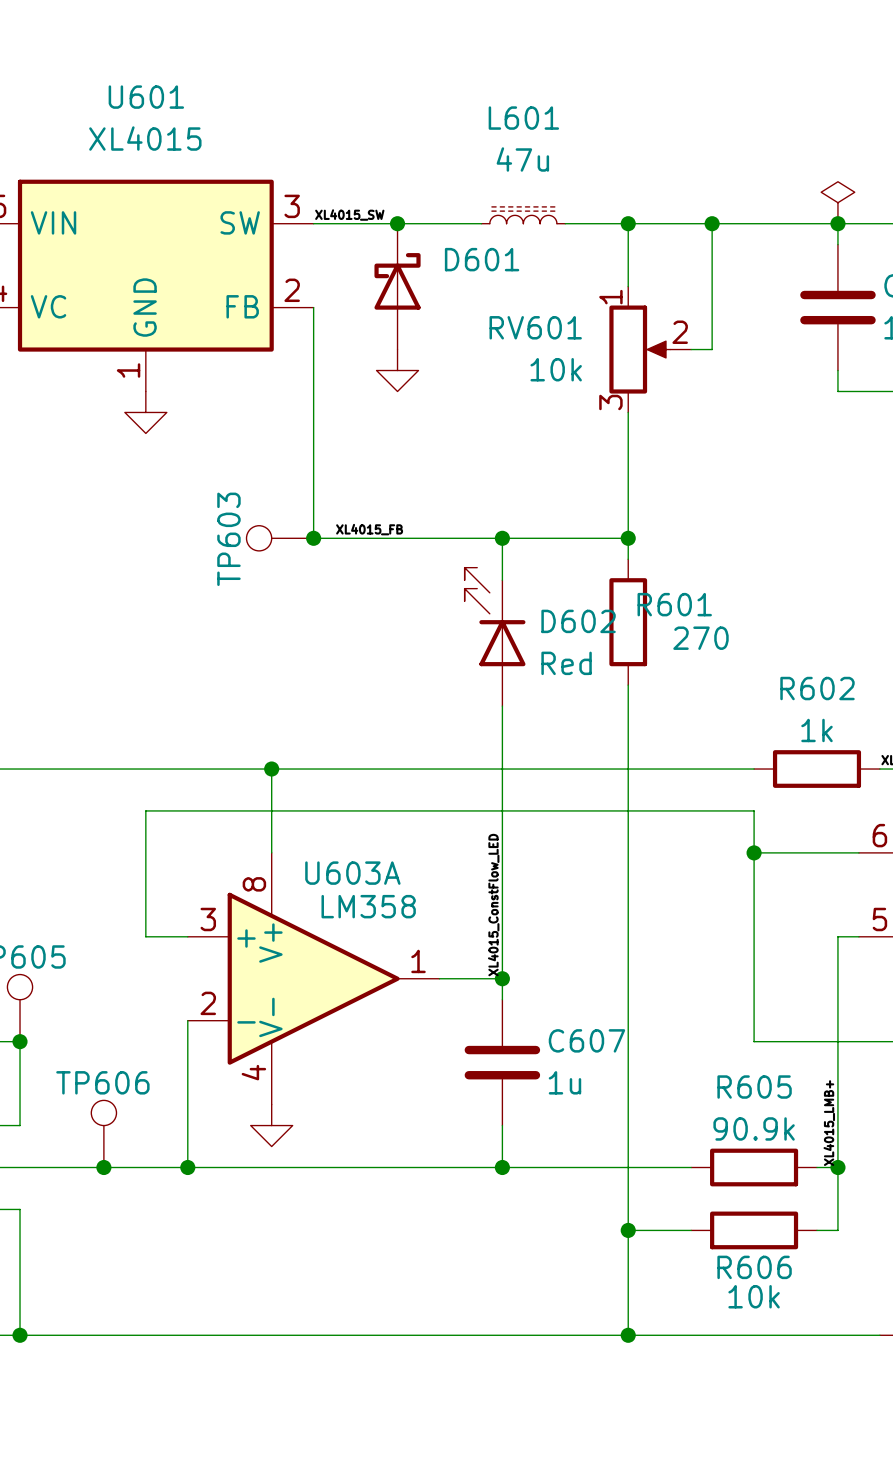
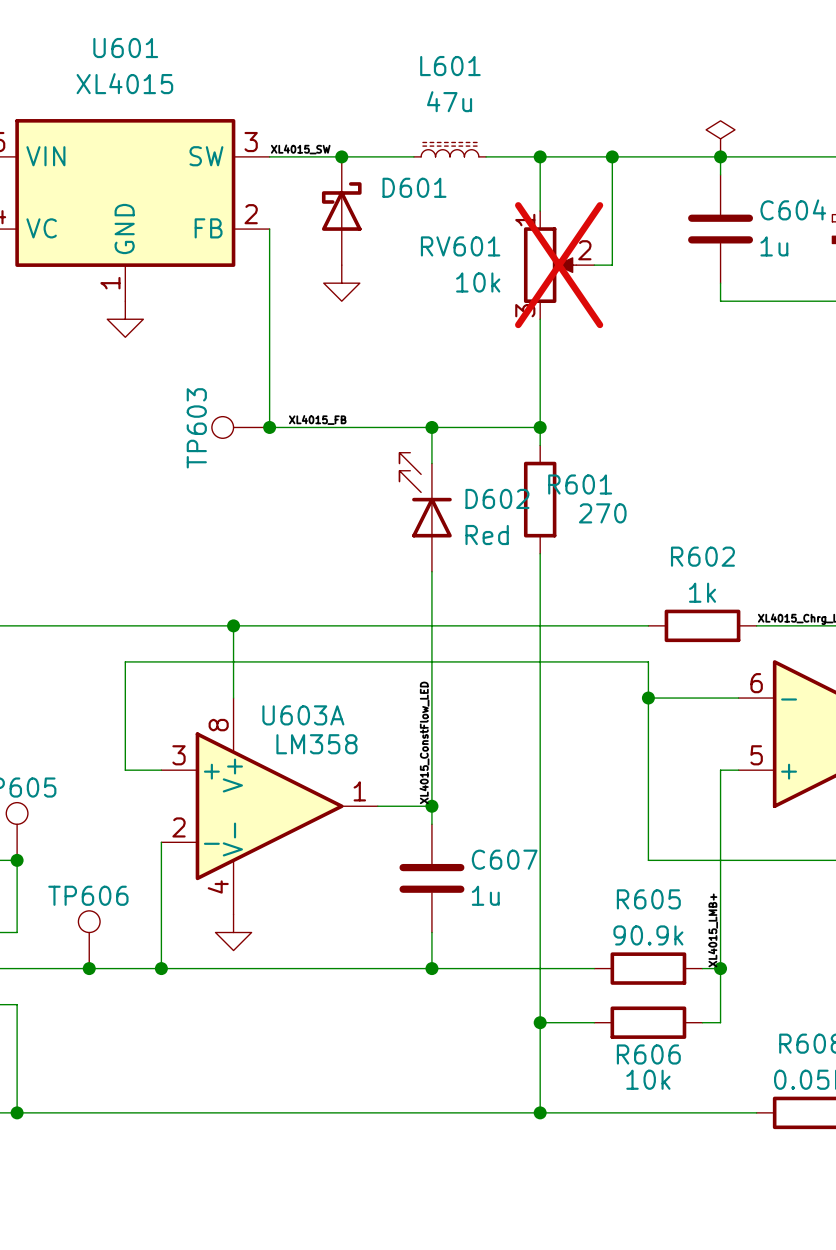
RV601 do-not-place cross: none -> (559, 265)

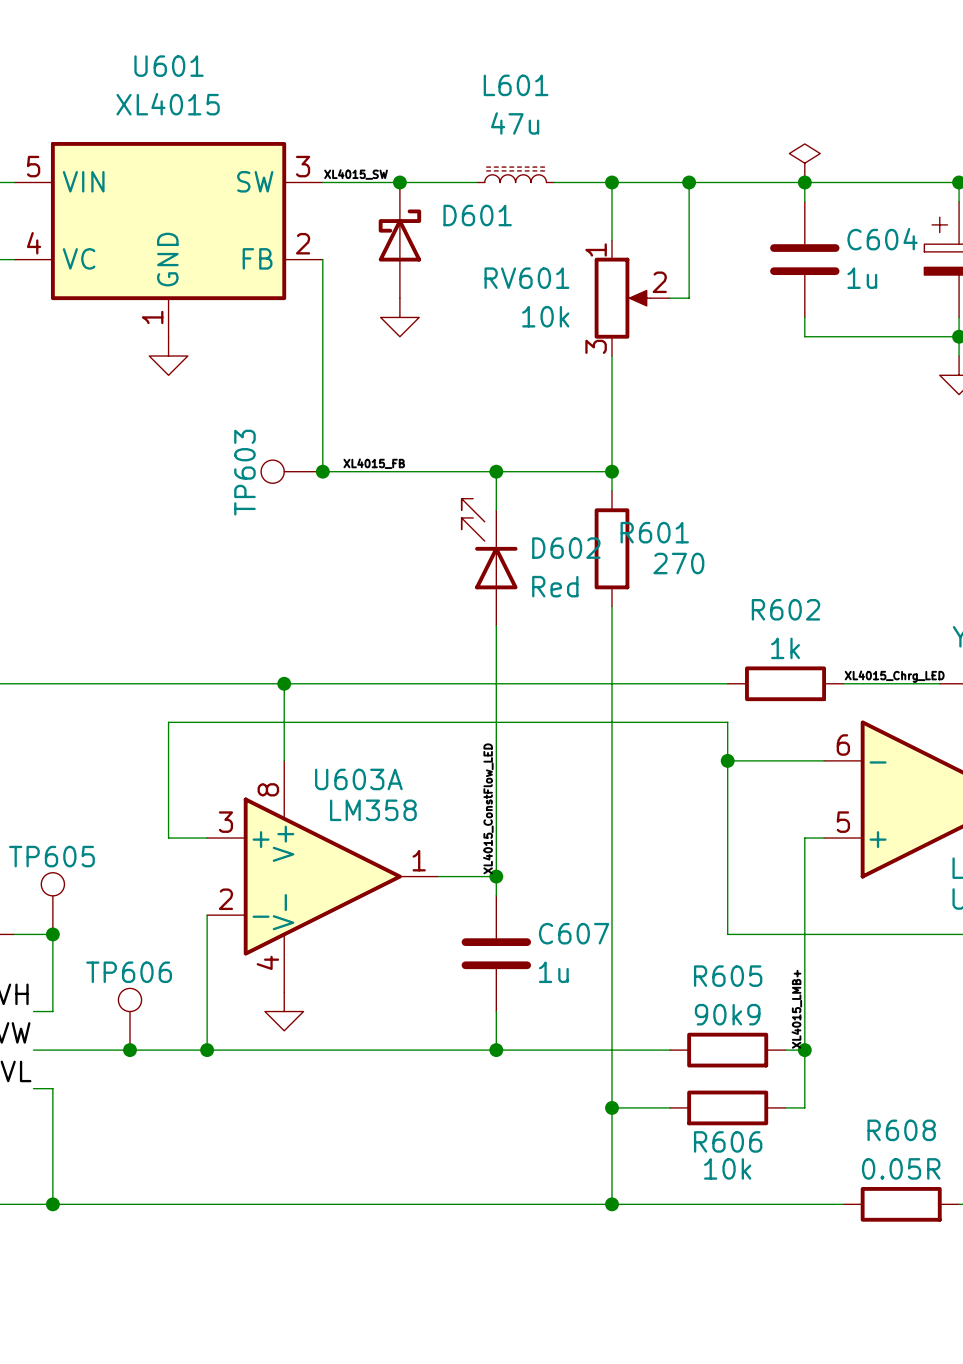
RV601 do-not-place cross: (559, 265) -> none
R605 value: 90.9k (648, 935) -> 90k9 (727, 1014)

